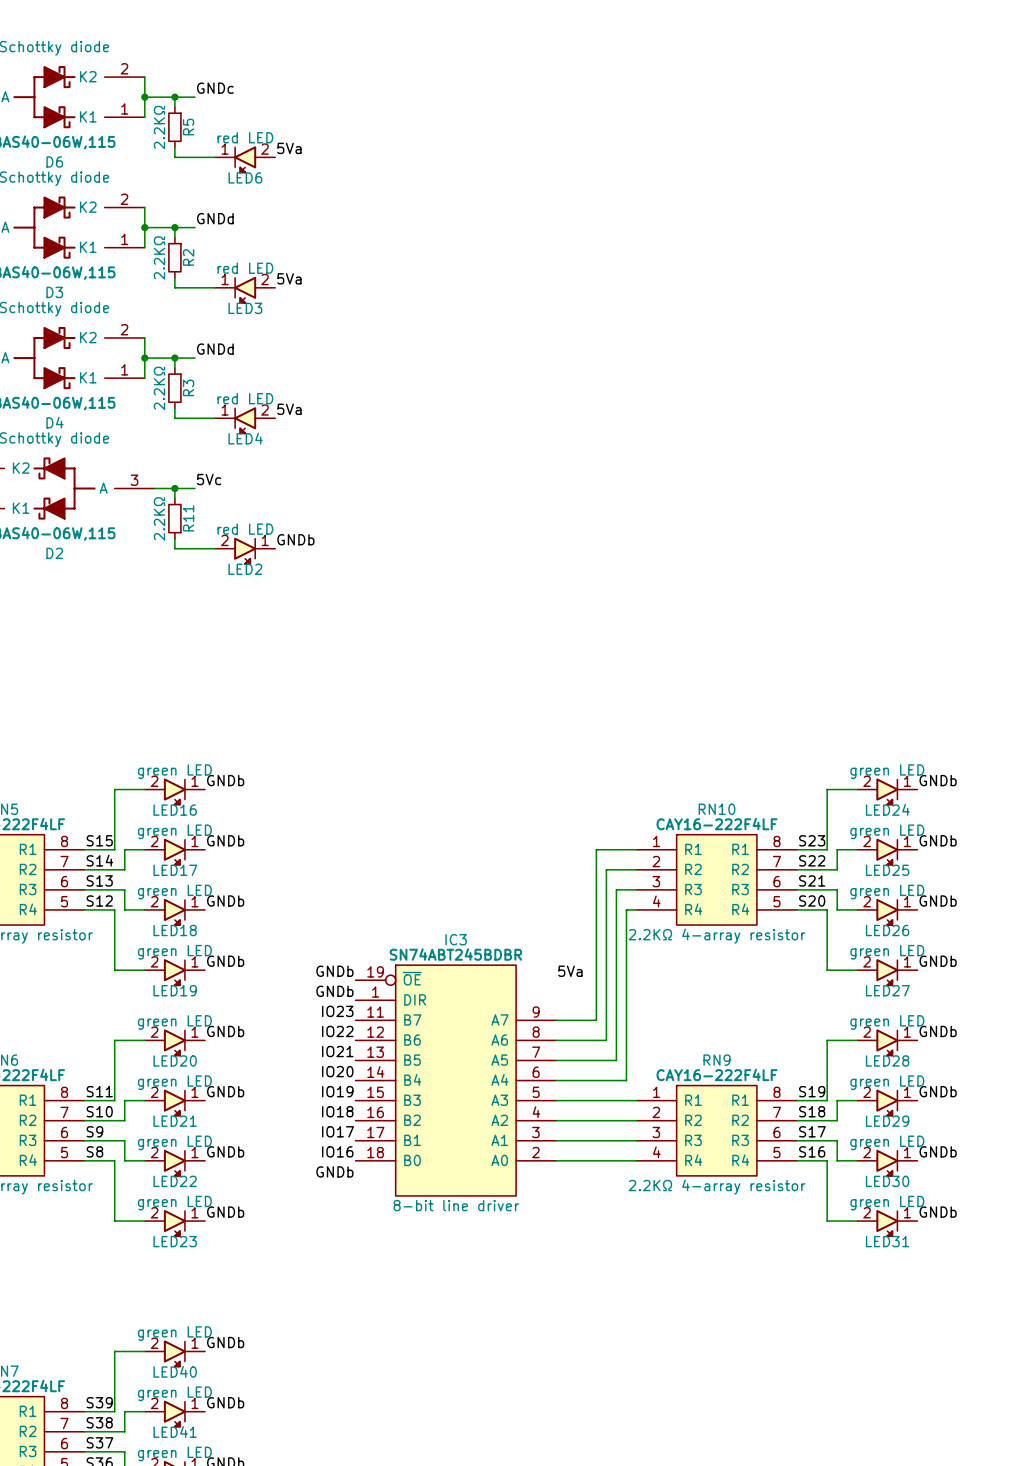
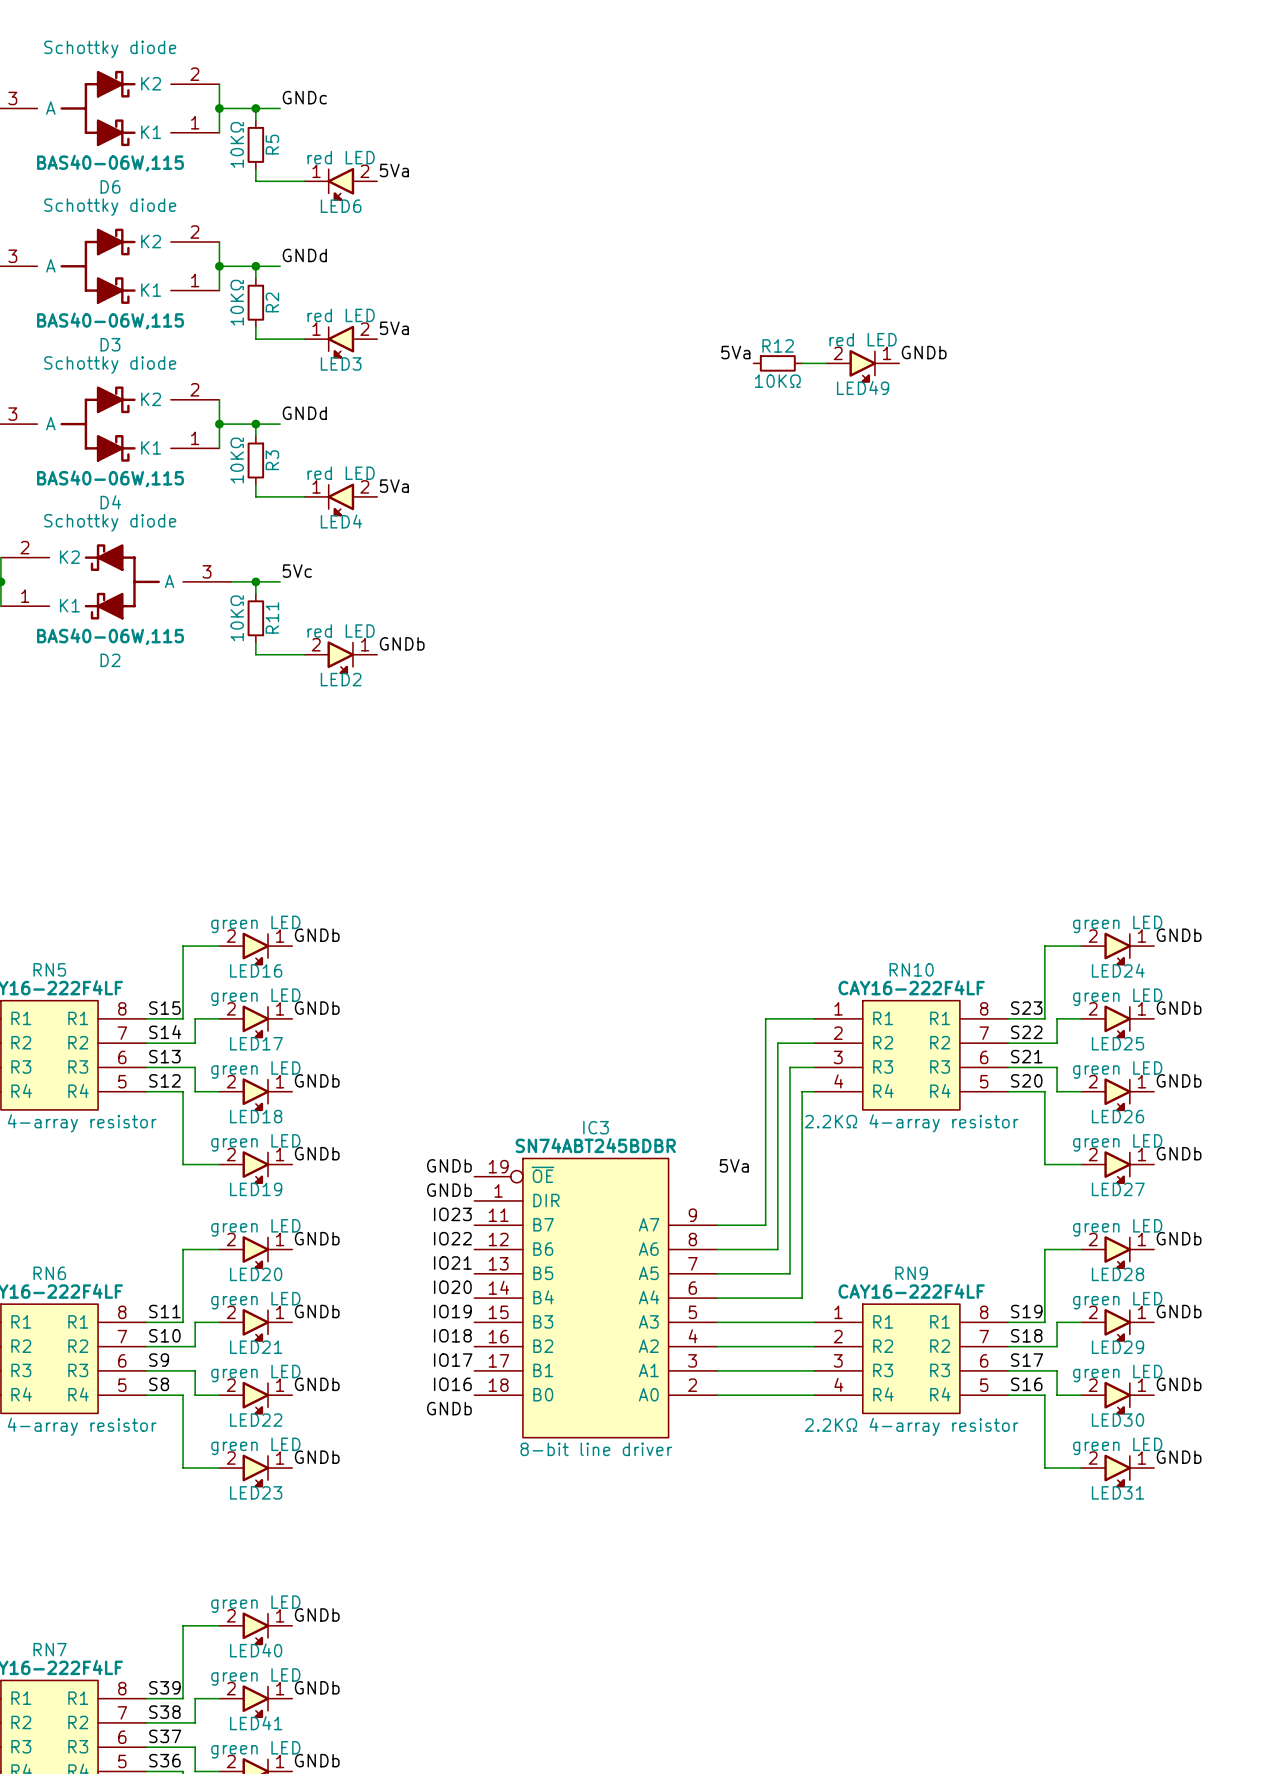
R5 value: 2.2KΩ (159, 127) -> 10KΩ (237, 144)
R2 value: 2.2KΩ (159, 257) -> 10KΩ (237, 302)
label: none -> 5Va (735, 352)
label: none -> GNDb (924, 352)
R12: none -> 10KΩ (777, 363)
wire: none -> (802, 363) (826, 363)
LED49: none -> (862, 366)
R3 value: 2.2KΩ (159, 388) -> 10KΩ (237, 460)
R11 value: 2.2KΩ (159, 518) -> 10KΩ (237, 618)

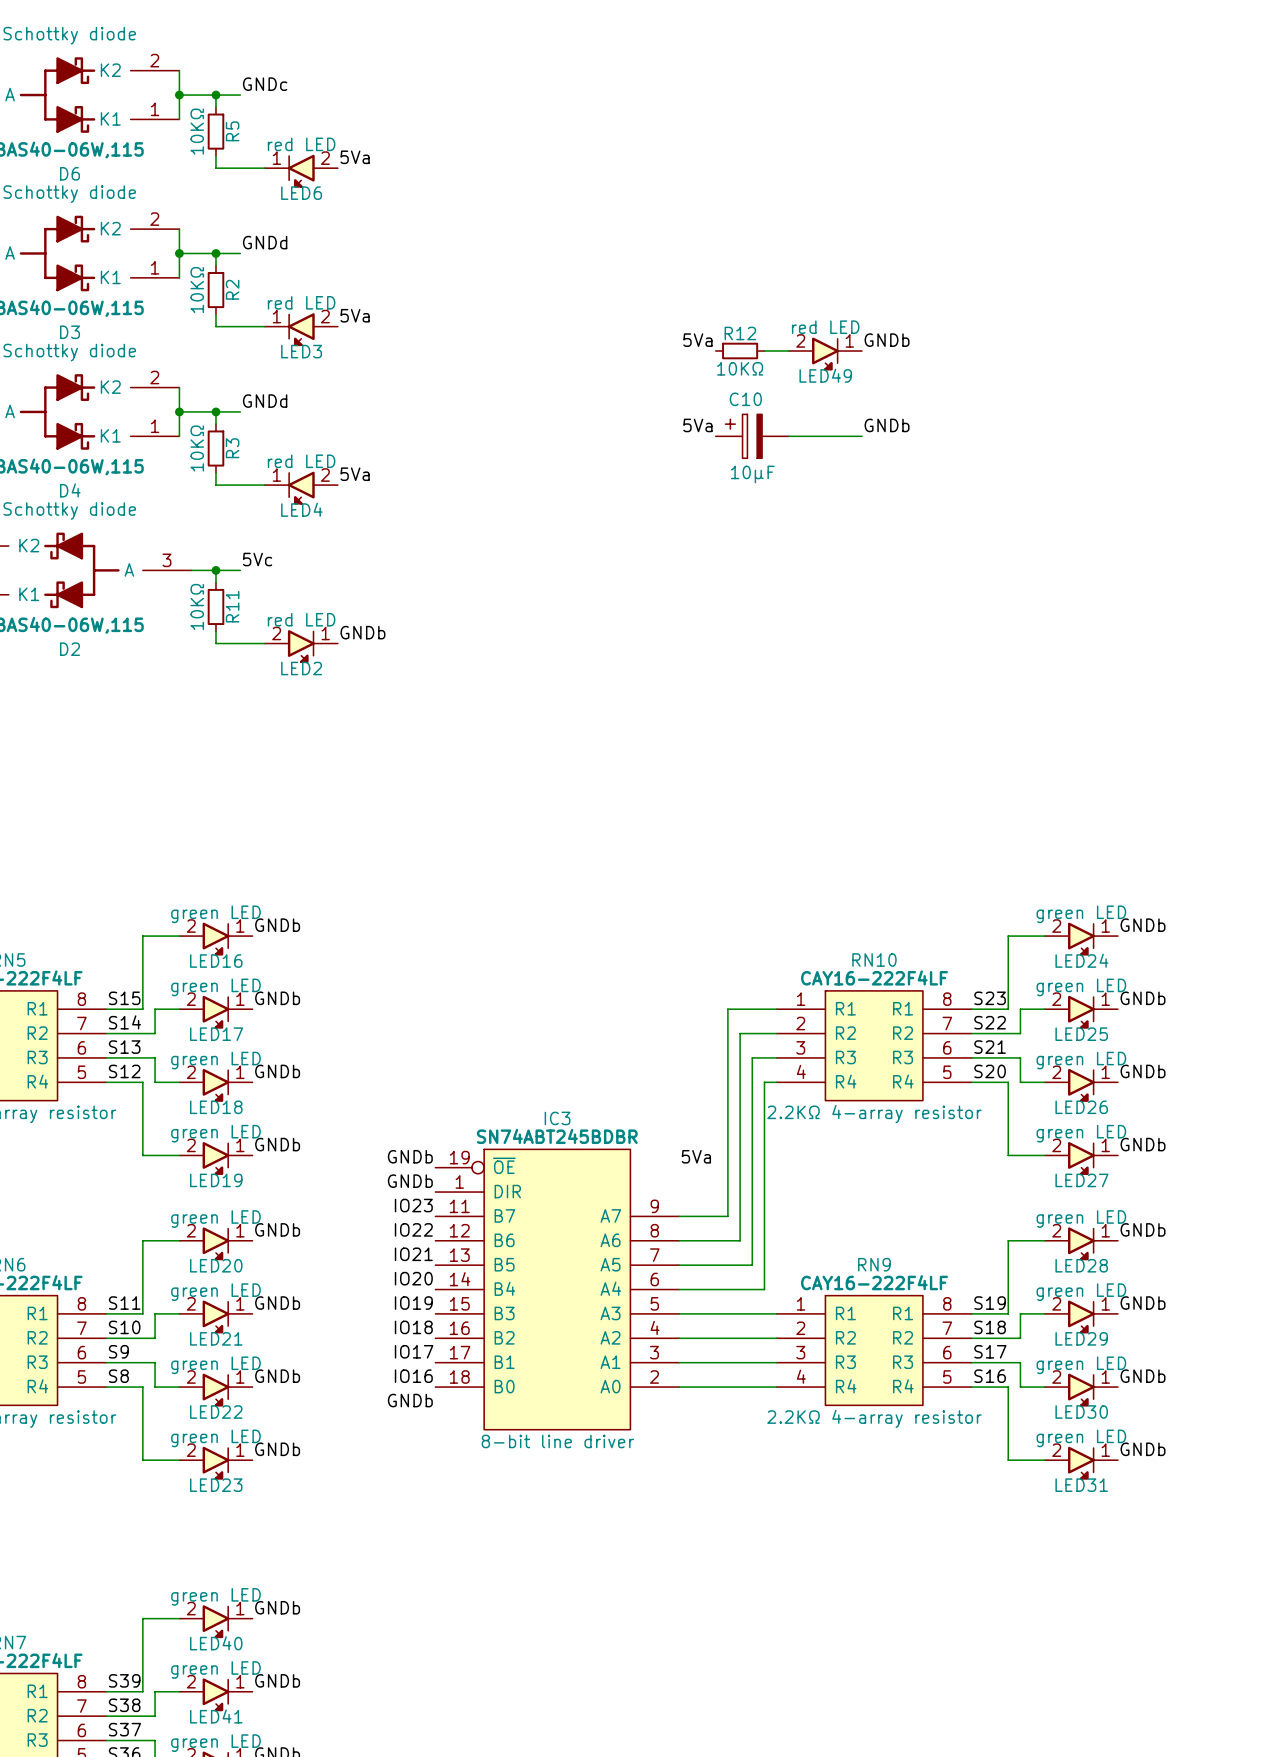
label: none -> 5Va (697, 425)
label: none -> GNDb (887, 425)
C10: none -> 10μF (752, 436)
wire: none -> (788, 436) (861, 436)

